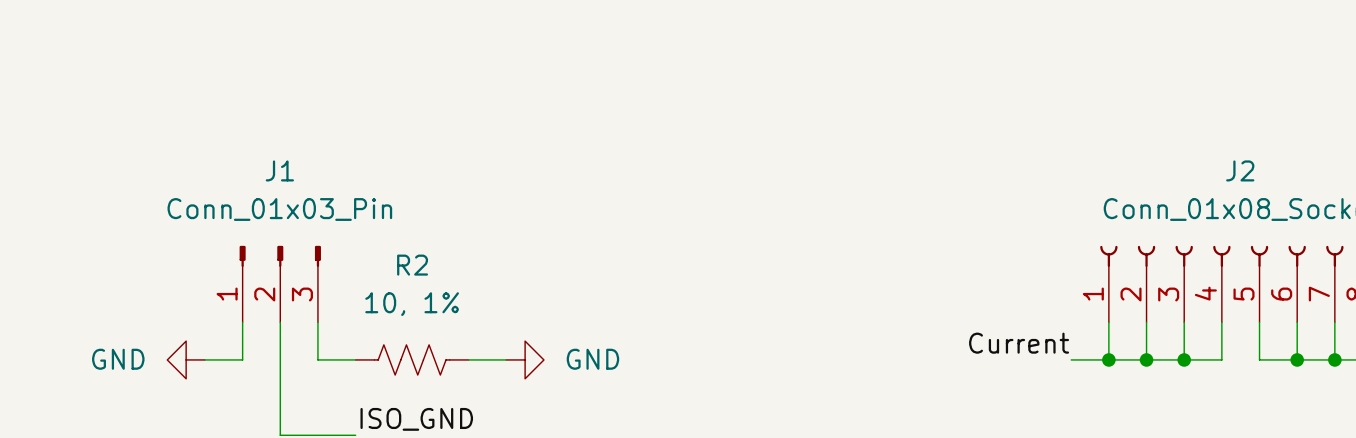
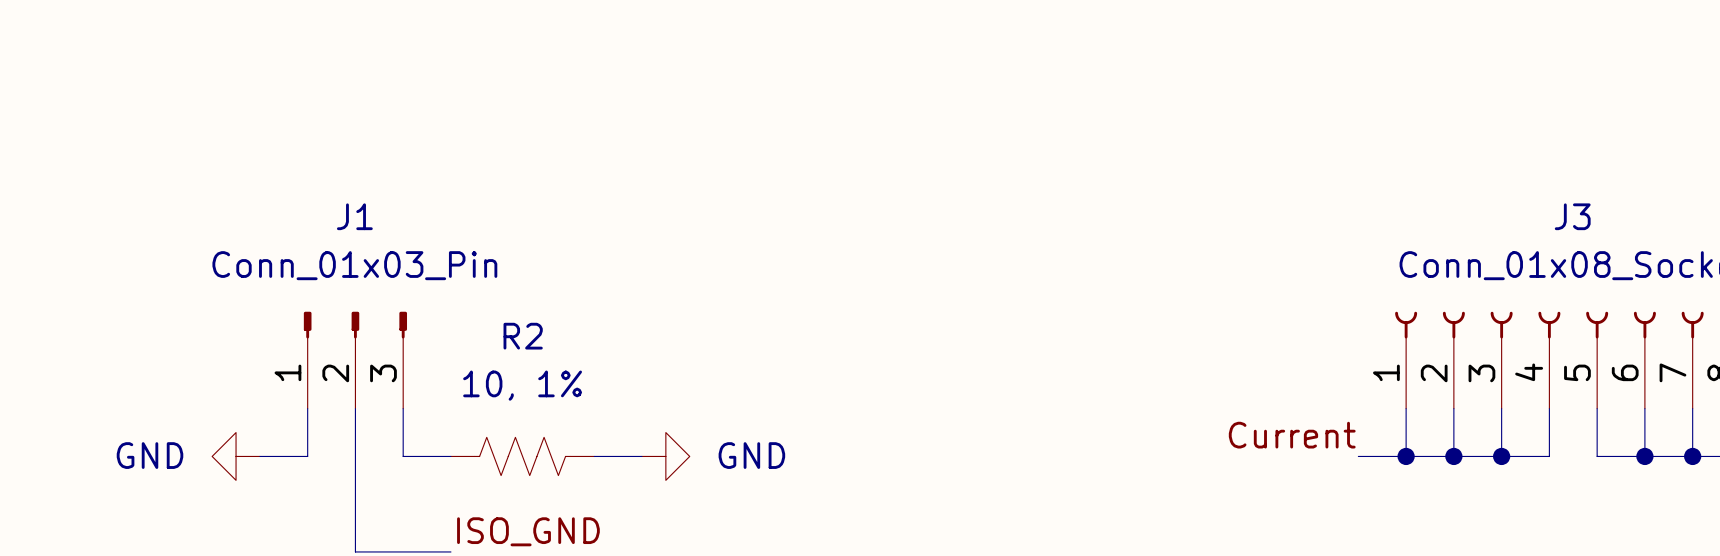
J2 name: J2 (1240, 170) -> J3 (1572, 216)

